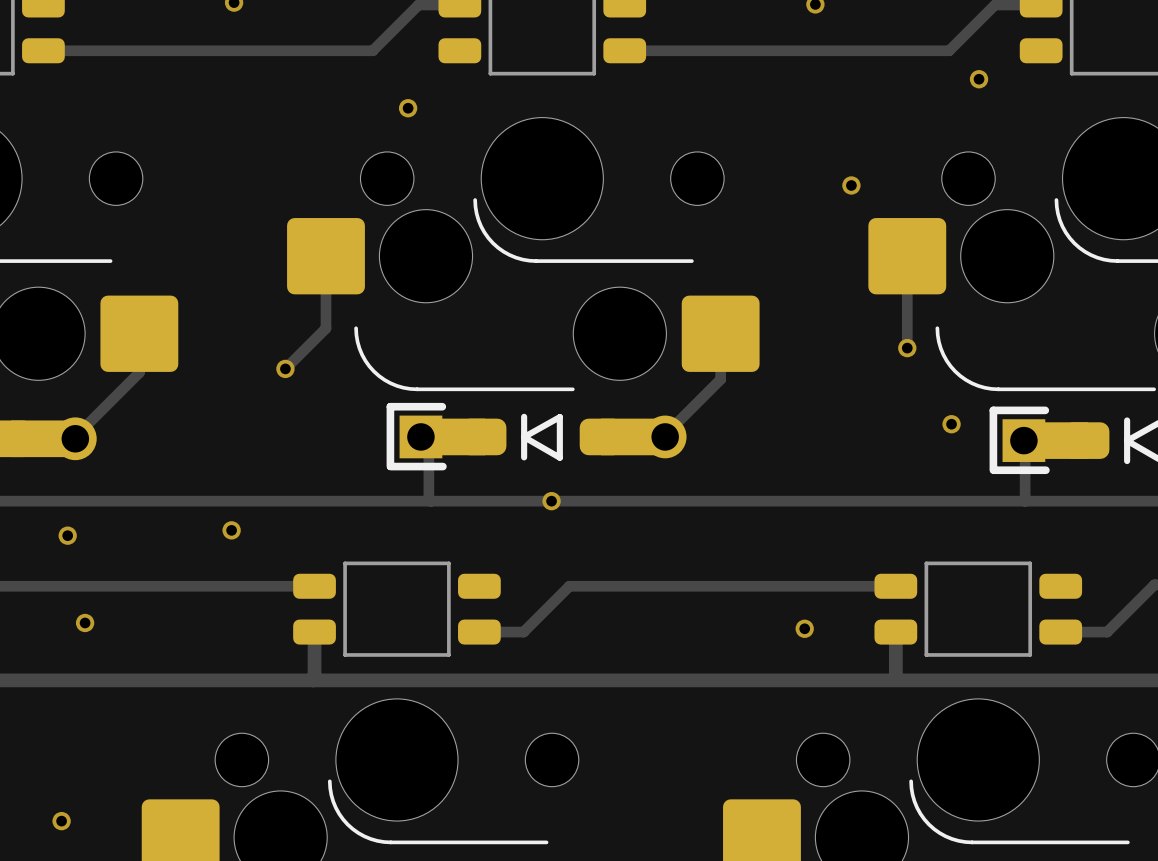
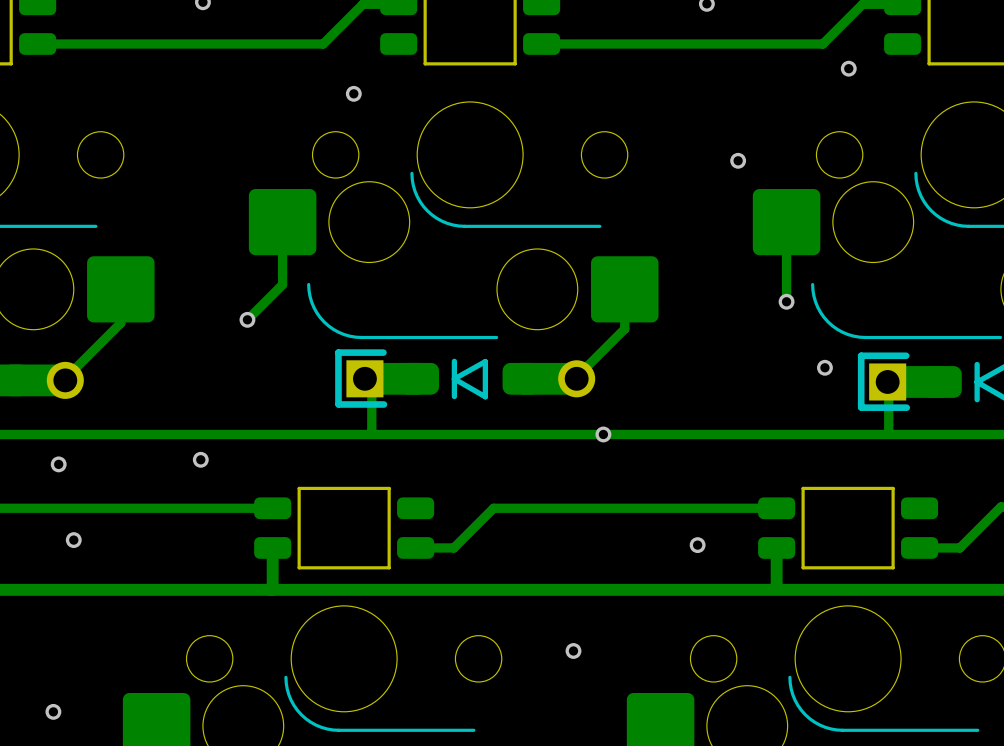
via: (551, 501) -> none
via: none -> (603, 434)
via: none -> (573, 650)

